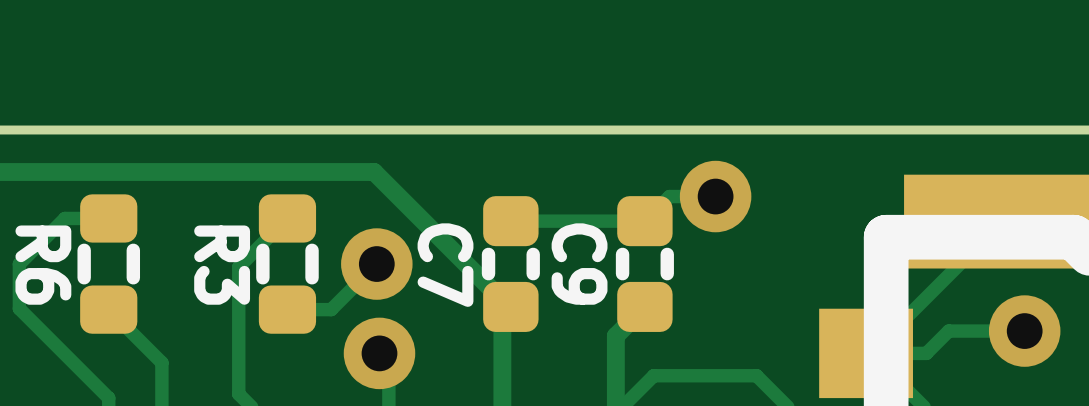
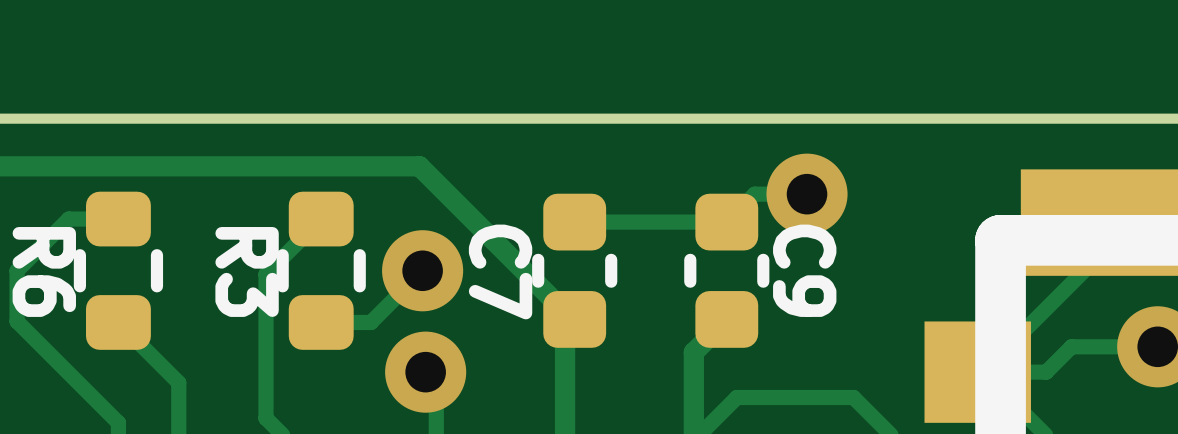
R6 footprint: [77, 194, 141, 334] -> [73, 191, 164, 350]
R3 footprint: [256, 194, 319, 334] -> [276, 191, 366, 350]
C7 footprint: [481, 196, 540, 332] -> [532, 193, 618, 348]
C9 footprint: [615, 196, 674, 332] -> [684, 193, 770, 348]
C9 name position: C9 (579, 264) -> C9 (804, 270)

